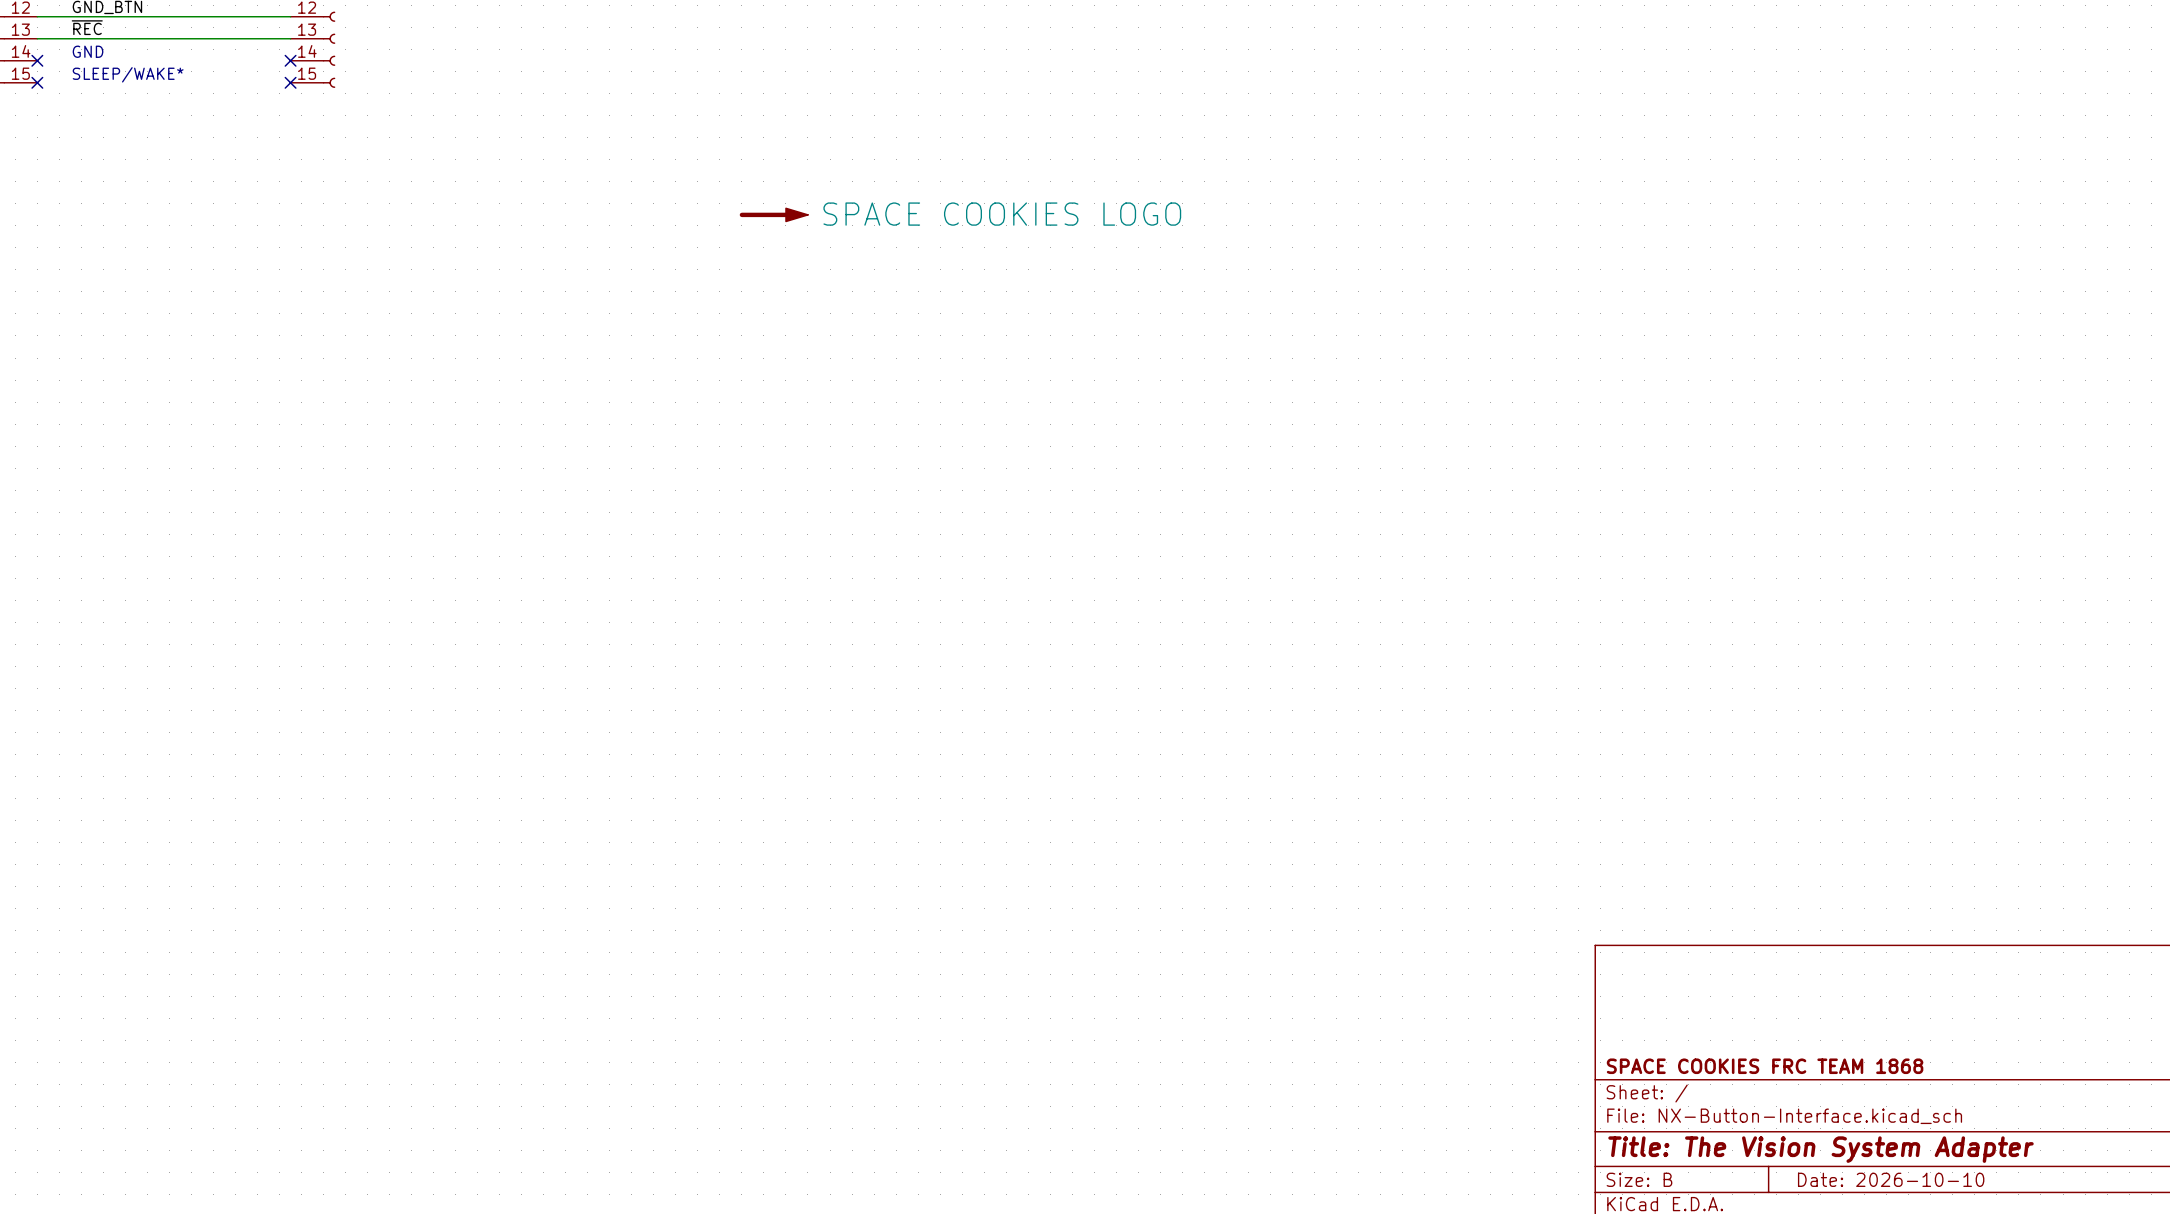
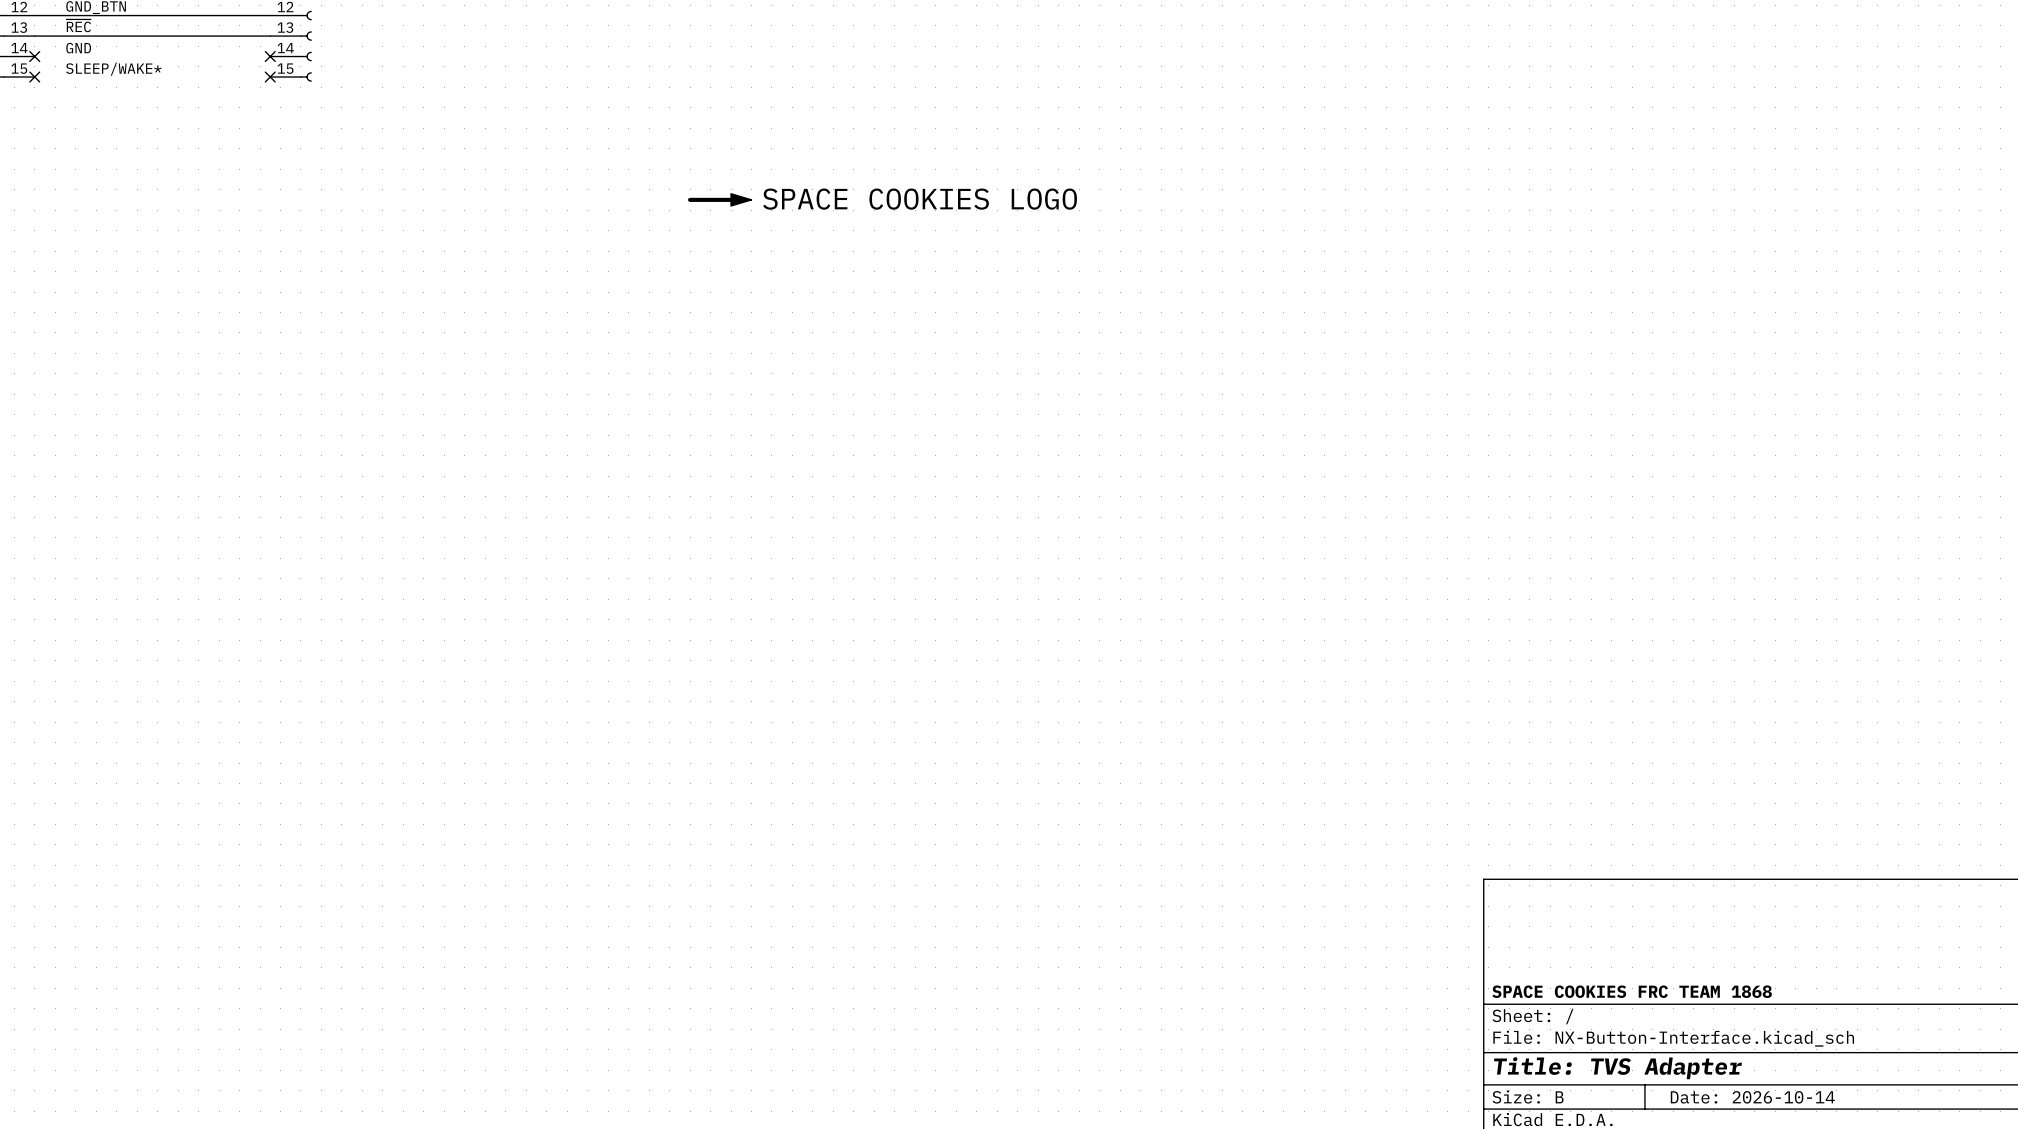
title block: Title: The Vision System Adapter (1821, 1149) -> Title: TVS Adapter (1617, 1068)
title block: Date: 2026-10-10 (1891, 1179) -> Date: 2026-10-14 (1752, 1097)

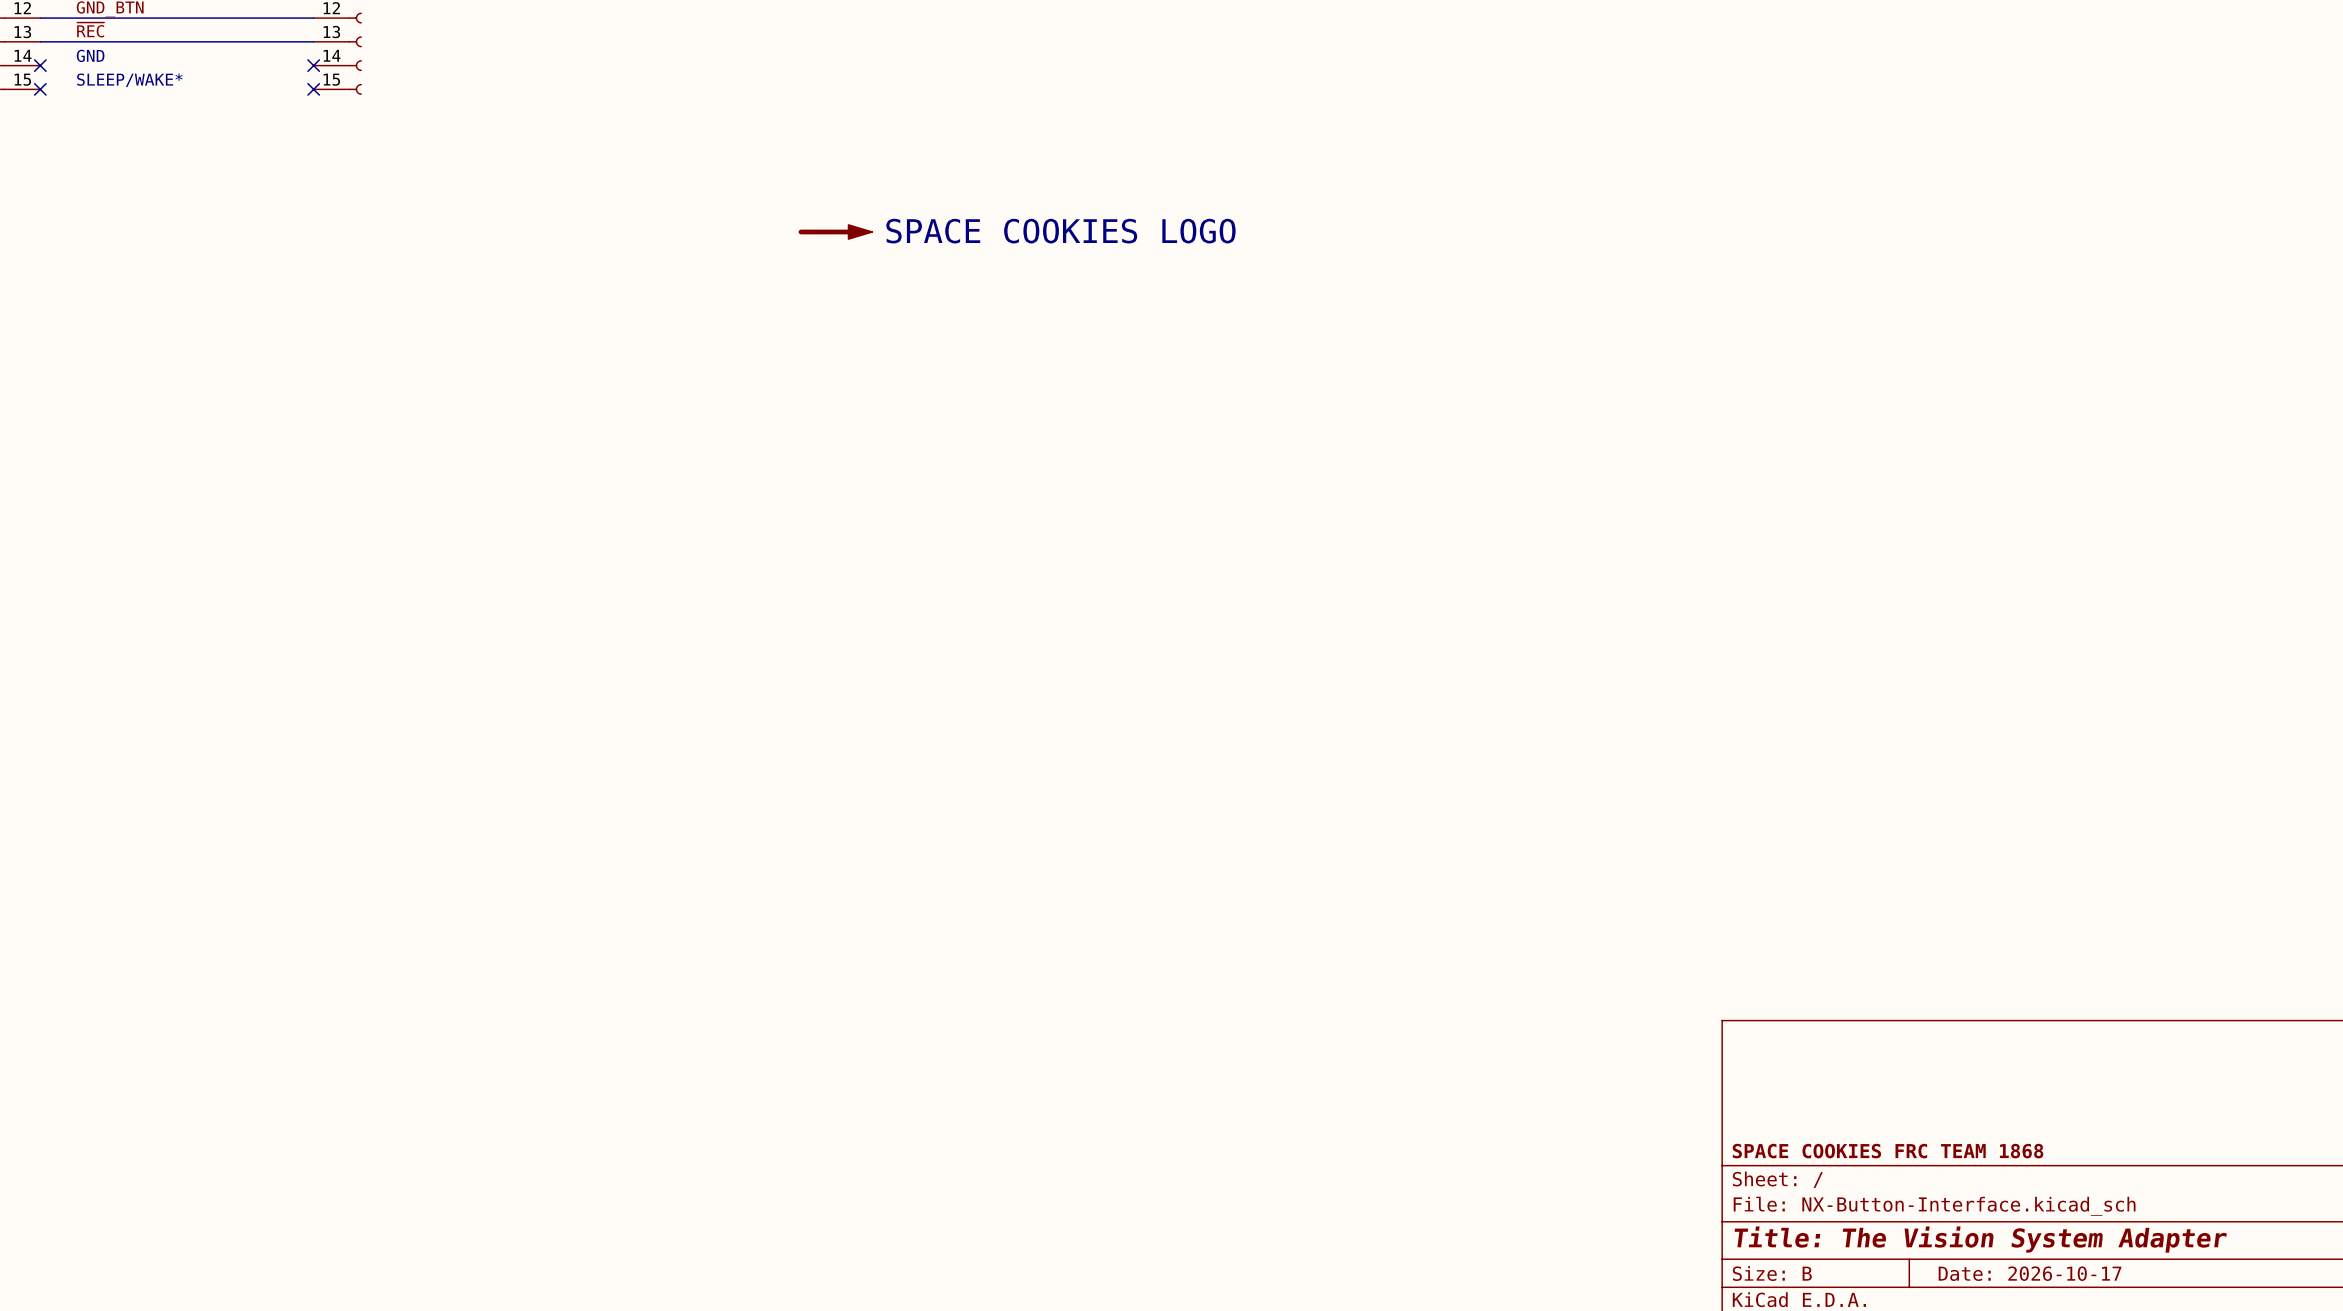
title block: Title: TVS Adapter (1617, 1068) -> Title: The Vision System Adapter (1980, 1239)
title block: Date: 2026-10-14 (1752, 1097) -> Date: 2026-10-17 (2030, 1273)

